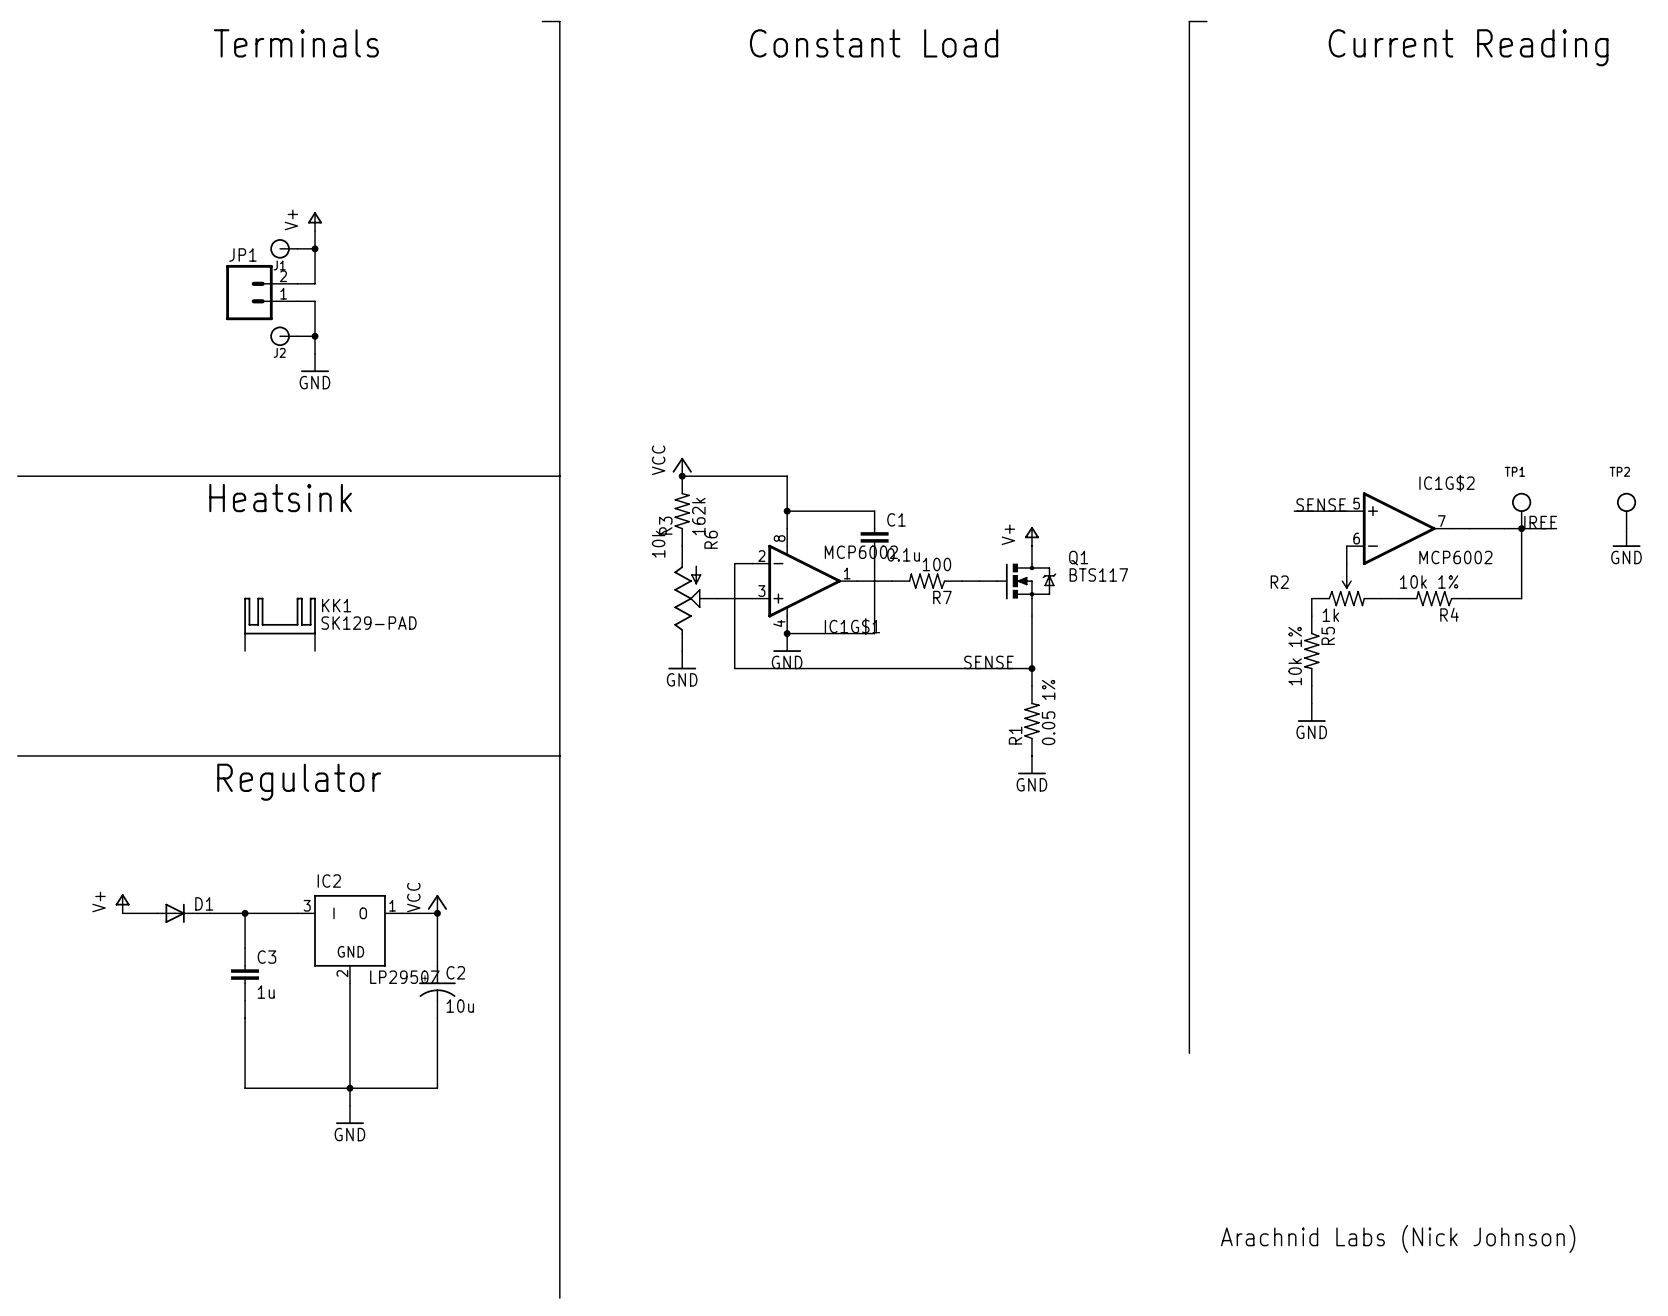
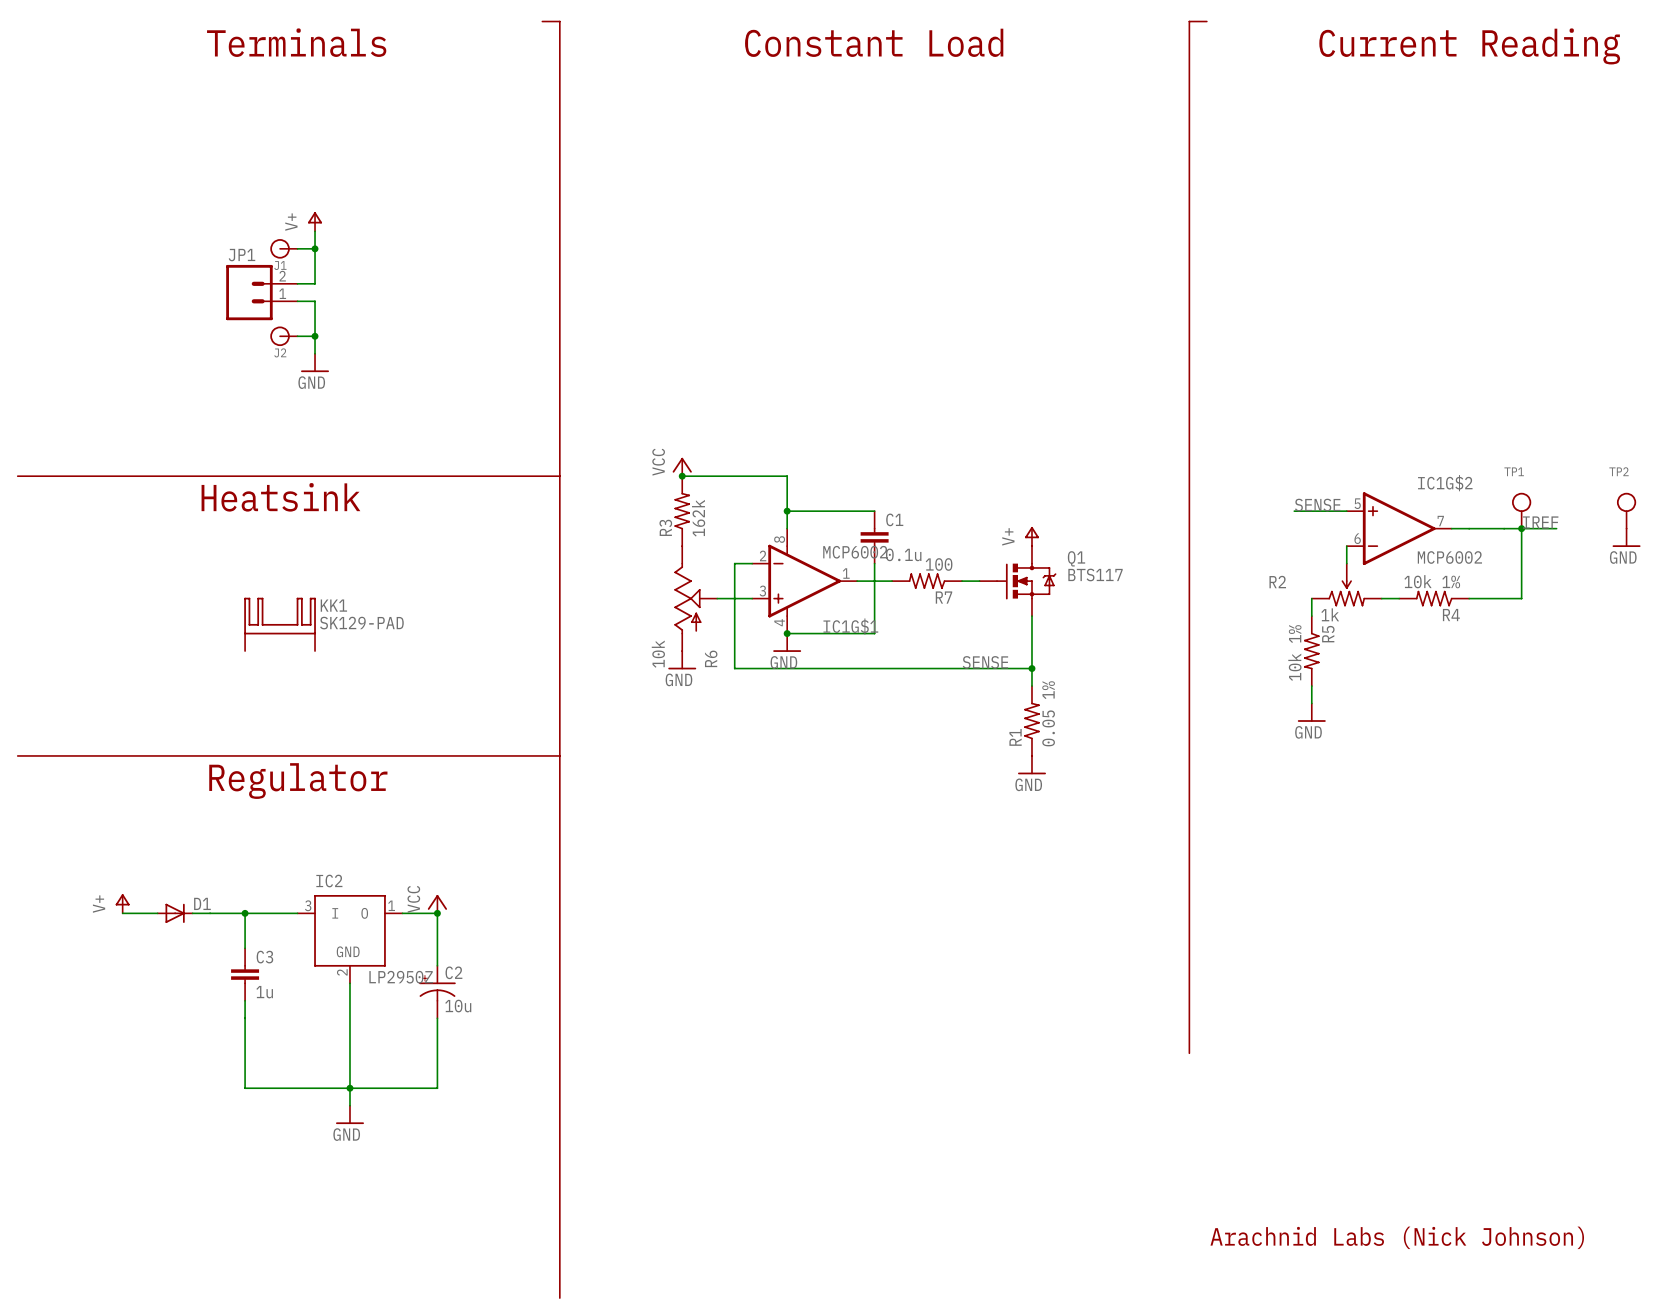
R6 flip: as is (687, 598) -> up-down (687, 598)

